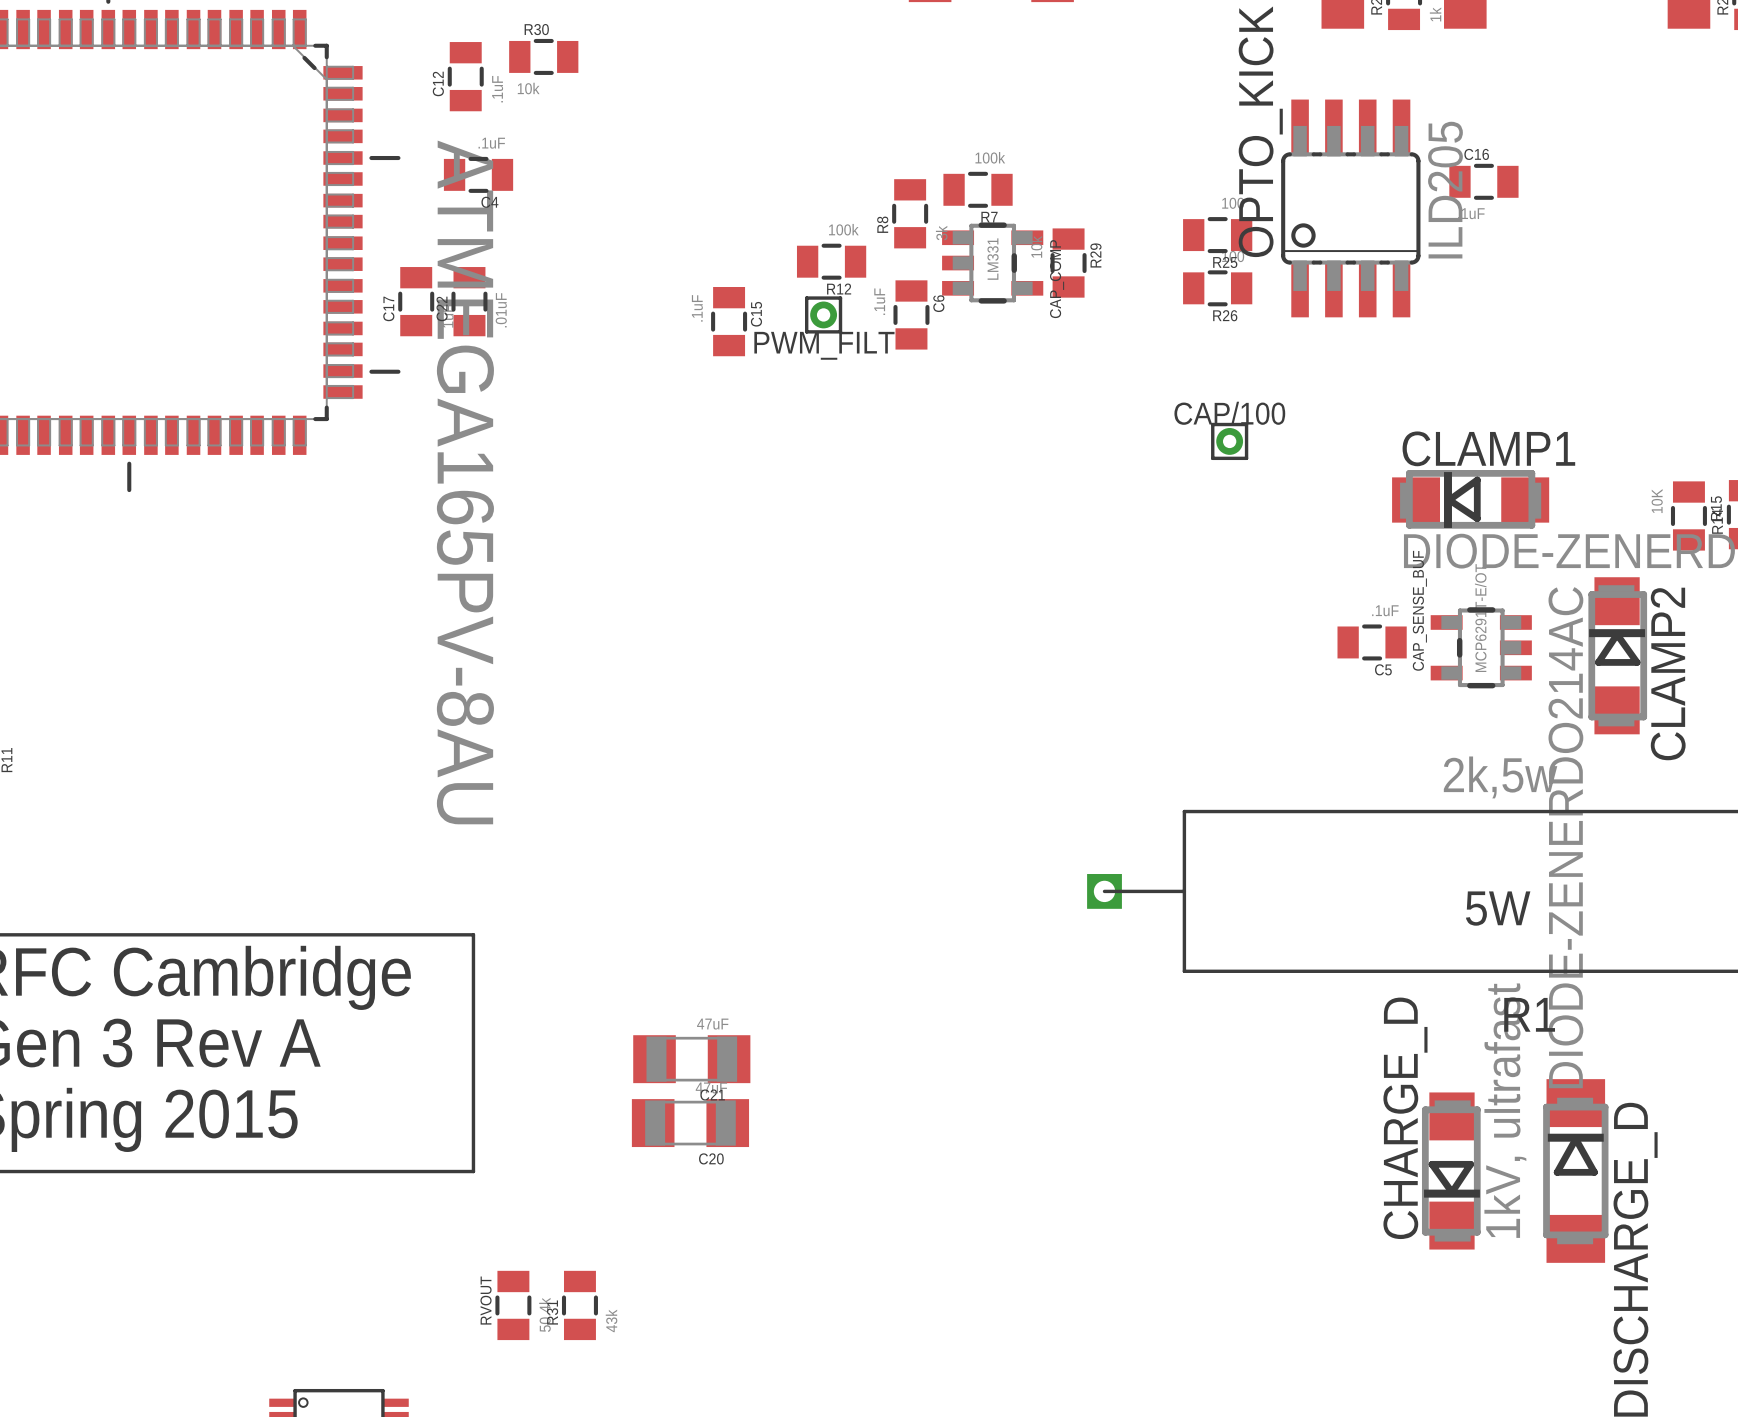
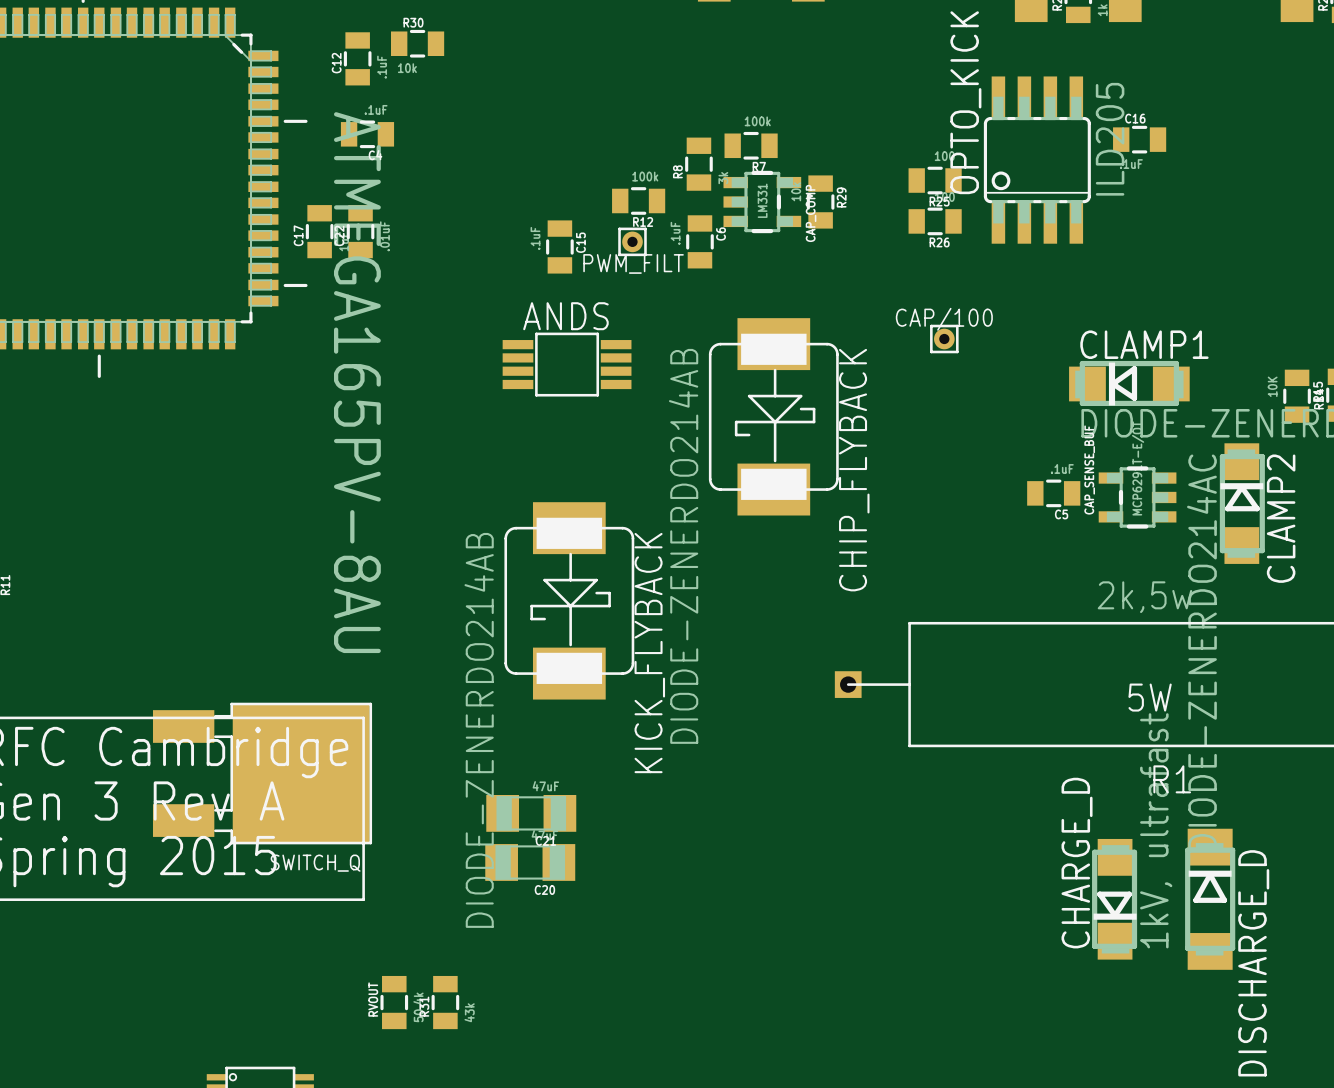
ANDS: none -> (567, 364)
CHIP_FLYBACK: none -> DIODE-ZENERDO214AB (773, 416)
KICK_FLYBACK: none -> DIODE-ZENERDO214AB (569, 600)
SWITCH_Q: none -> (262, 773)

